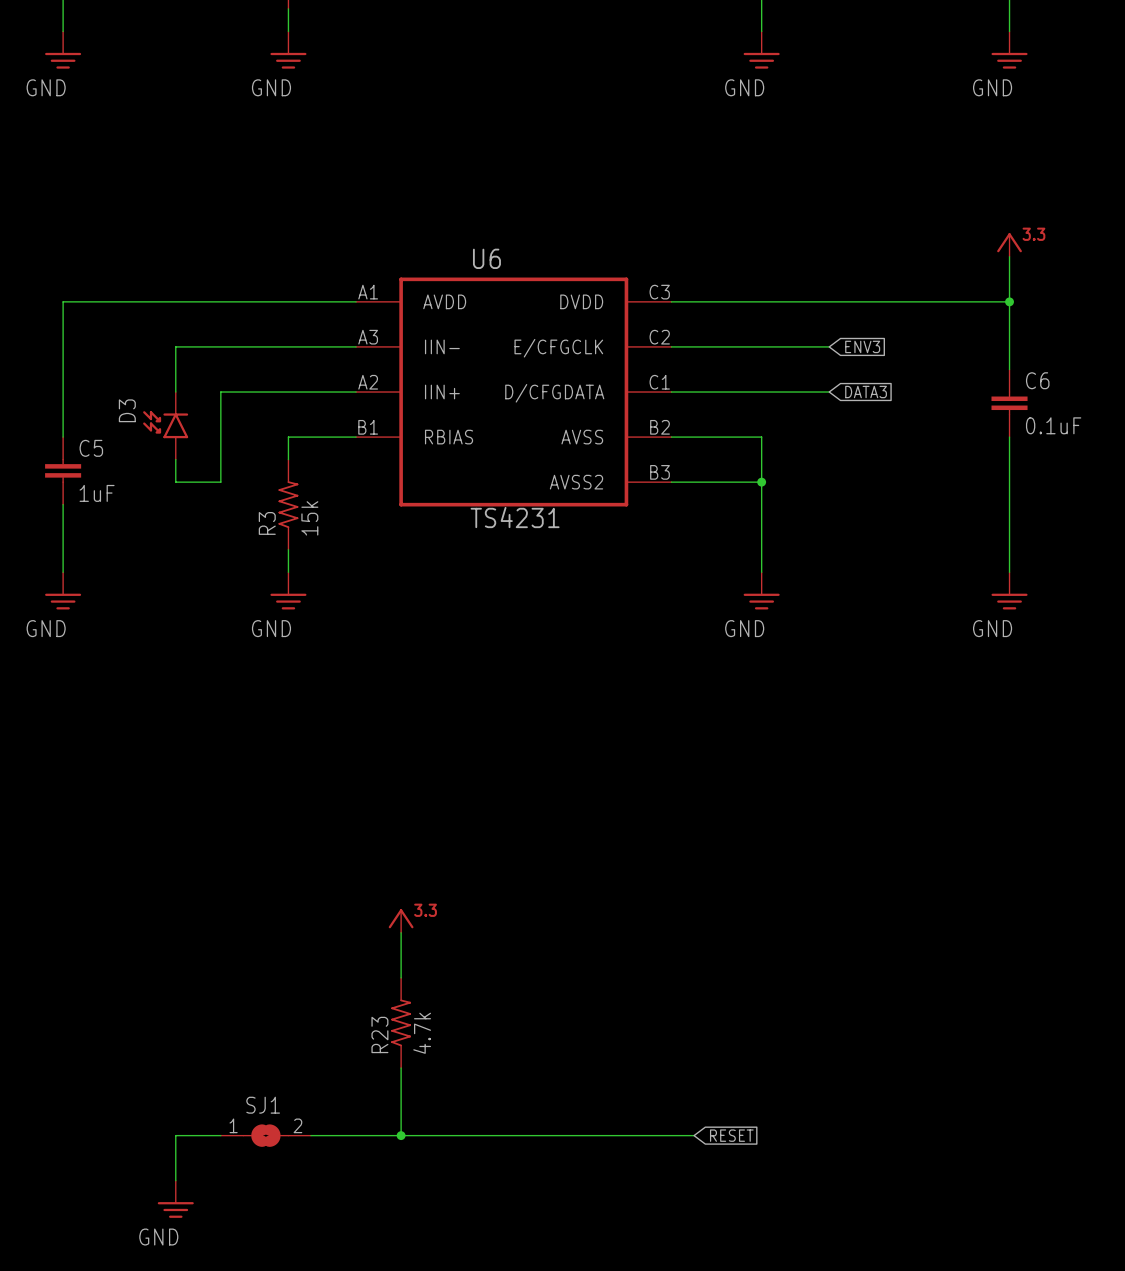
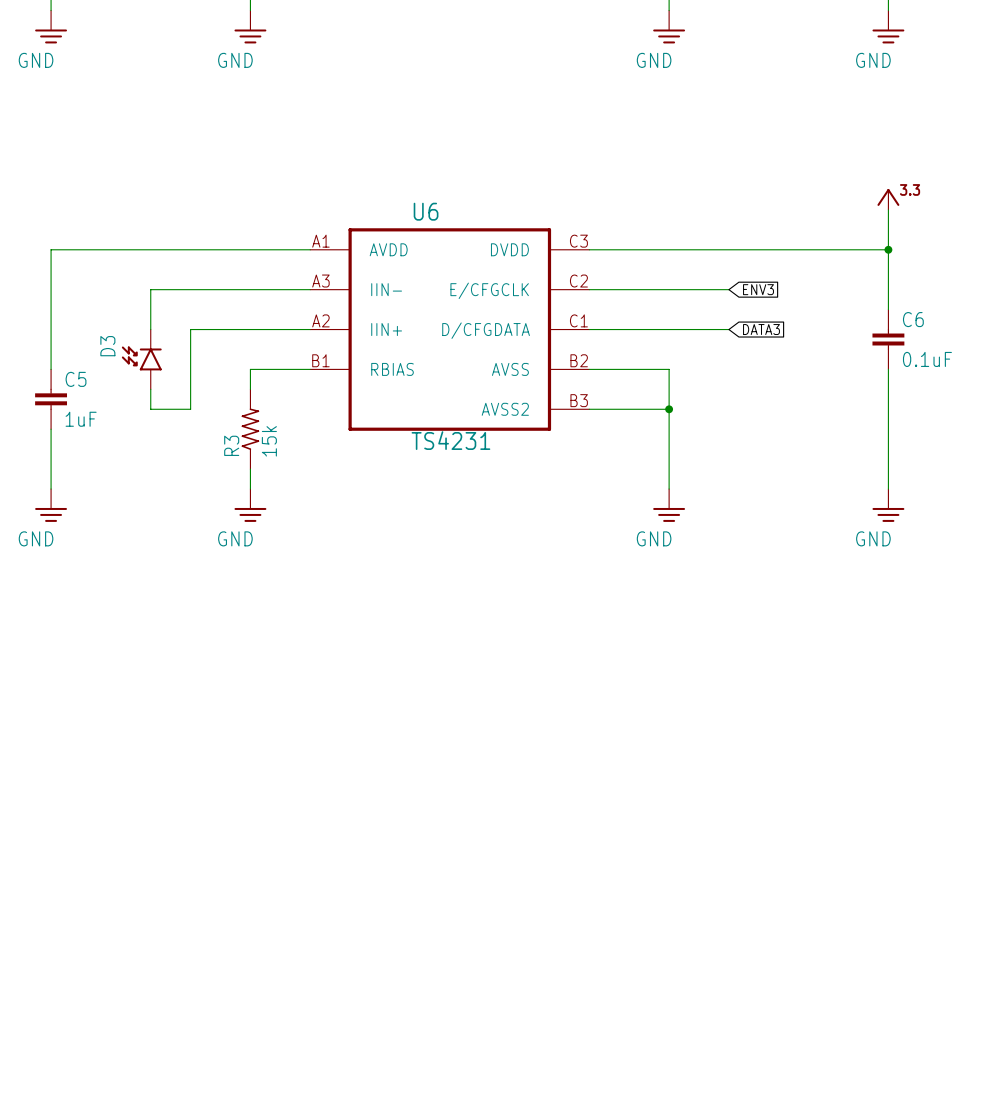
power symbol: (401, 920) -> none
wire: (401, 932) (401, 977) -> none
R23: 4.7k (401, 1022) -> none
wire: (401, 1068) (401, 1135) -> none
wire: (220, 1135) (175, 1135) (175, 1180) -> none
SJ1: (265, 1135) -> none
wire: (310, 1135) (694, 1135) -> none
junction: (401, 1135) -> none
global label: RESET (731, 1135) -> none
power symbol: GND (175, 1199) -> none

